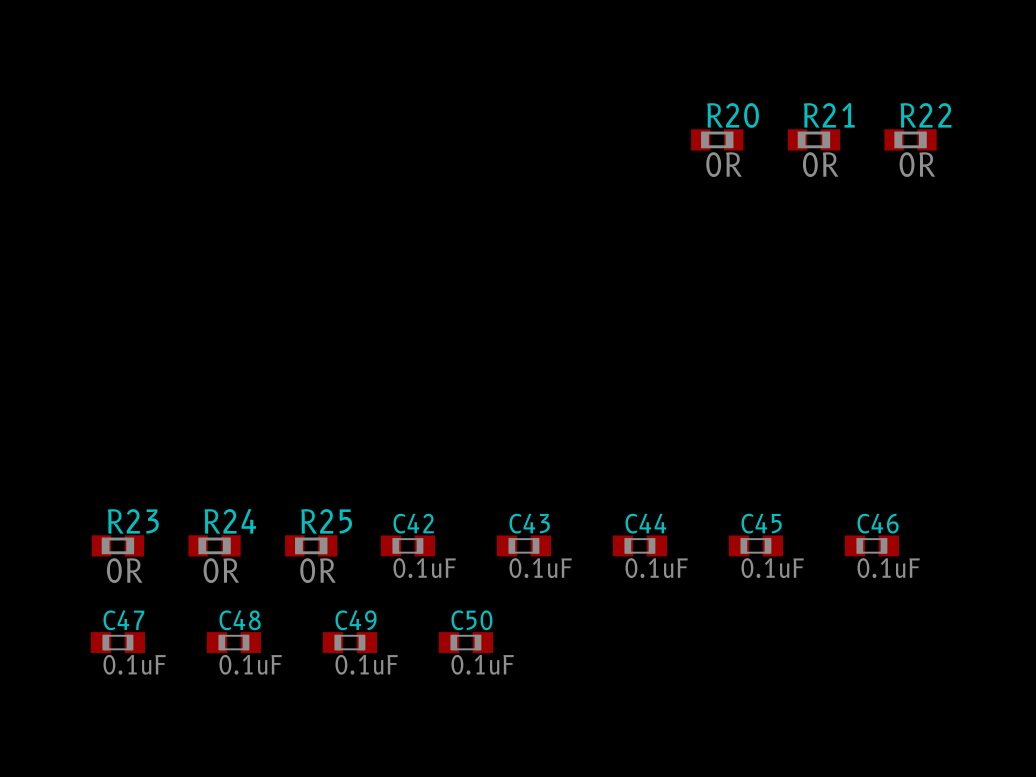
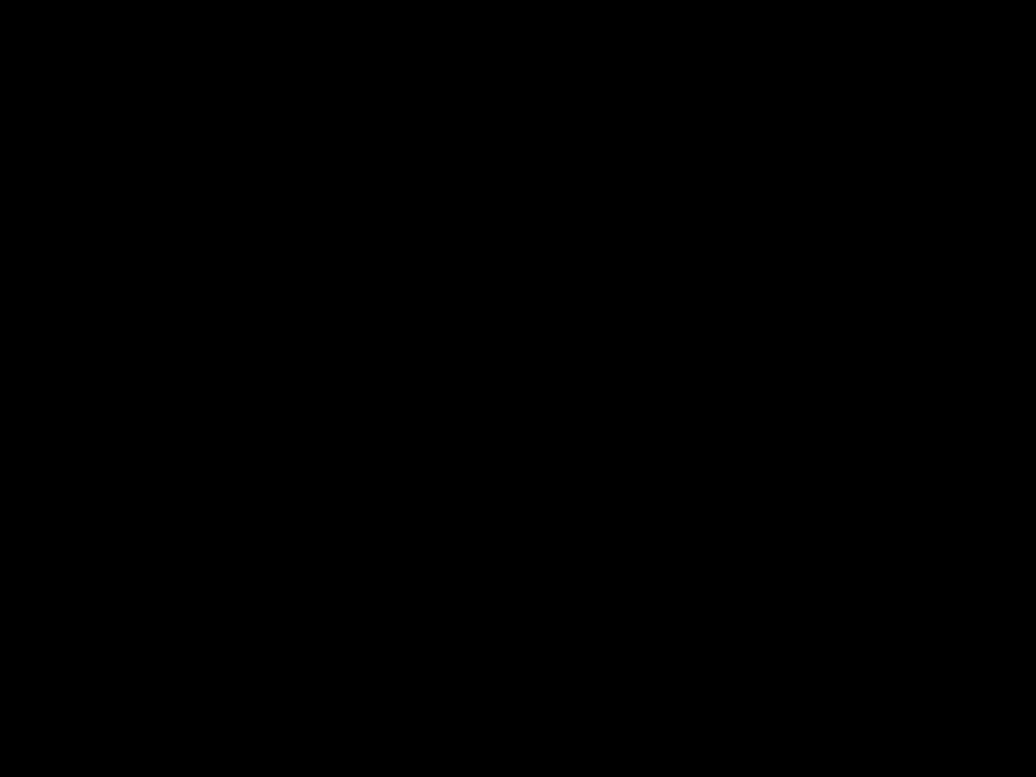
R20: 0R (717, 139) -> none
R21: 0R (813, 139) -> none
R22: 0R (910, 139) -> none
R23: 0R (117, 545) -> none
R24: 0R (214, 545) -> none
R25: 0R (311, 545) -> none
C42: 0.1uF (407, 545) -> none
C43: 0.1uF (523, 545) -> none
C44: 0.1uF (639, 545) -> none
C45: 0.1uF (755, 545) -> none
C46: 0.1uF (871, 545) -> none
C47: 0.1uF (117, 642) -> none
C48: 0.1uF (233, 642) -> none
C49: 0.1uF (349, 642) -> none
C50: 0.1uF (465, 642) -> none

